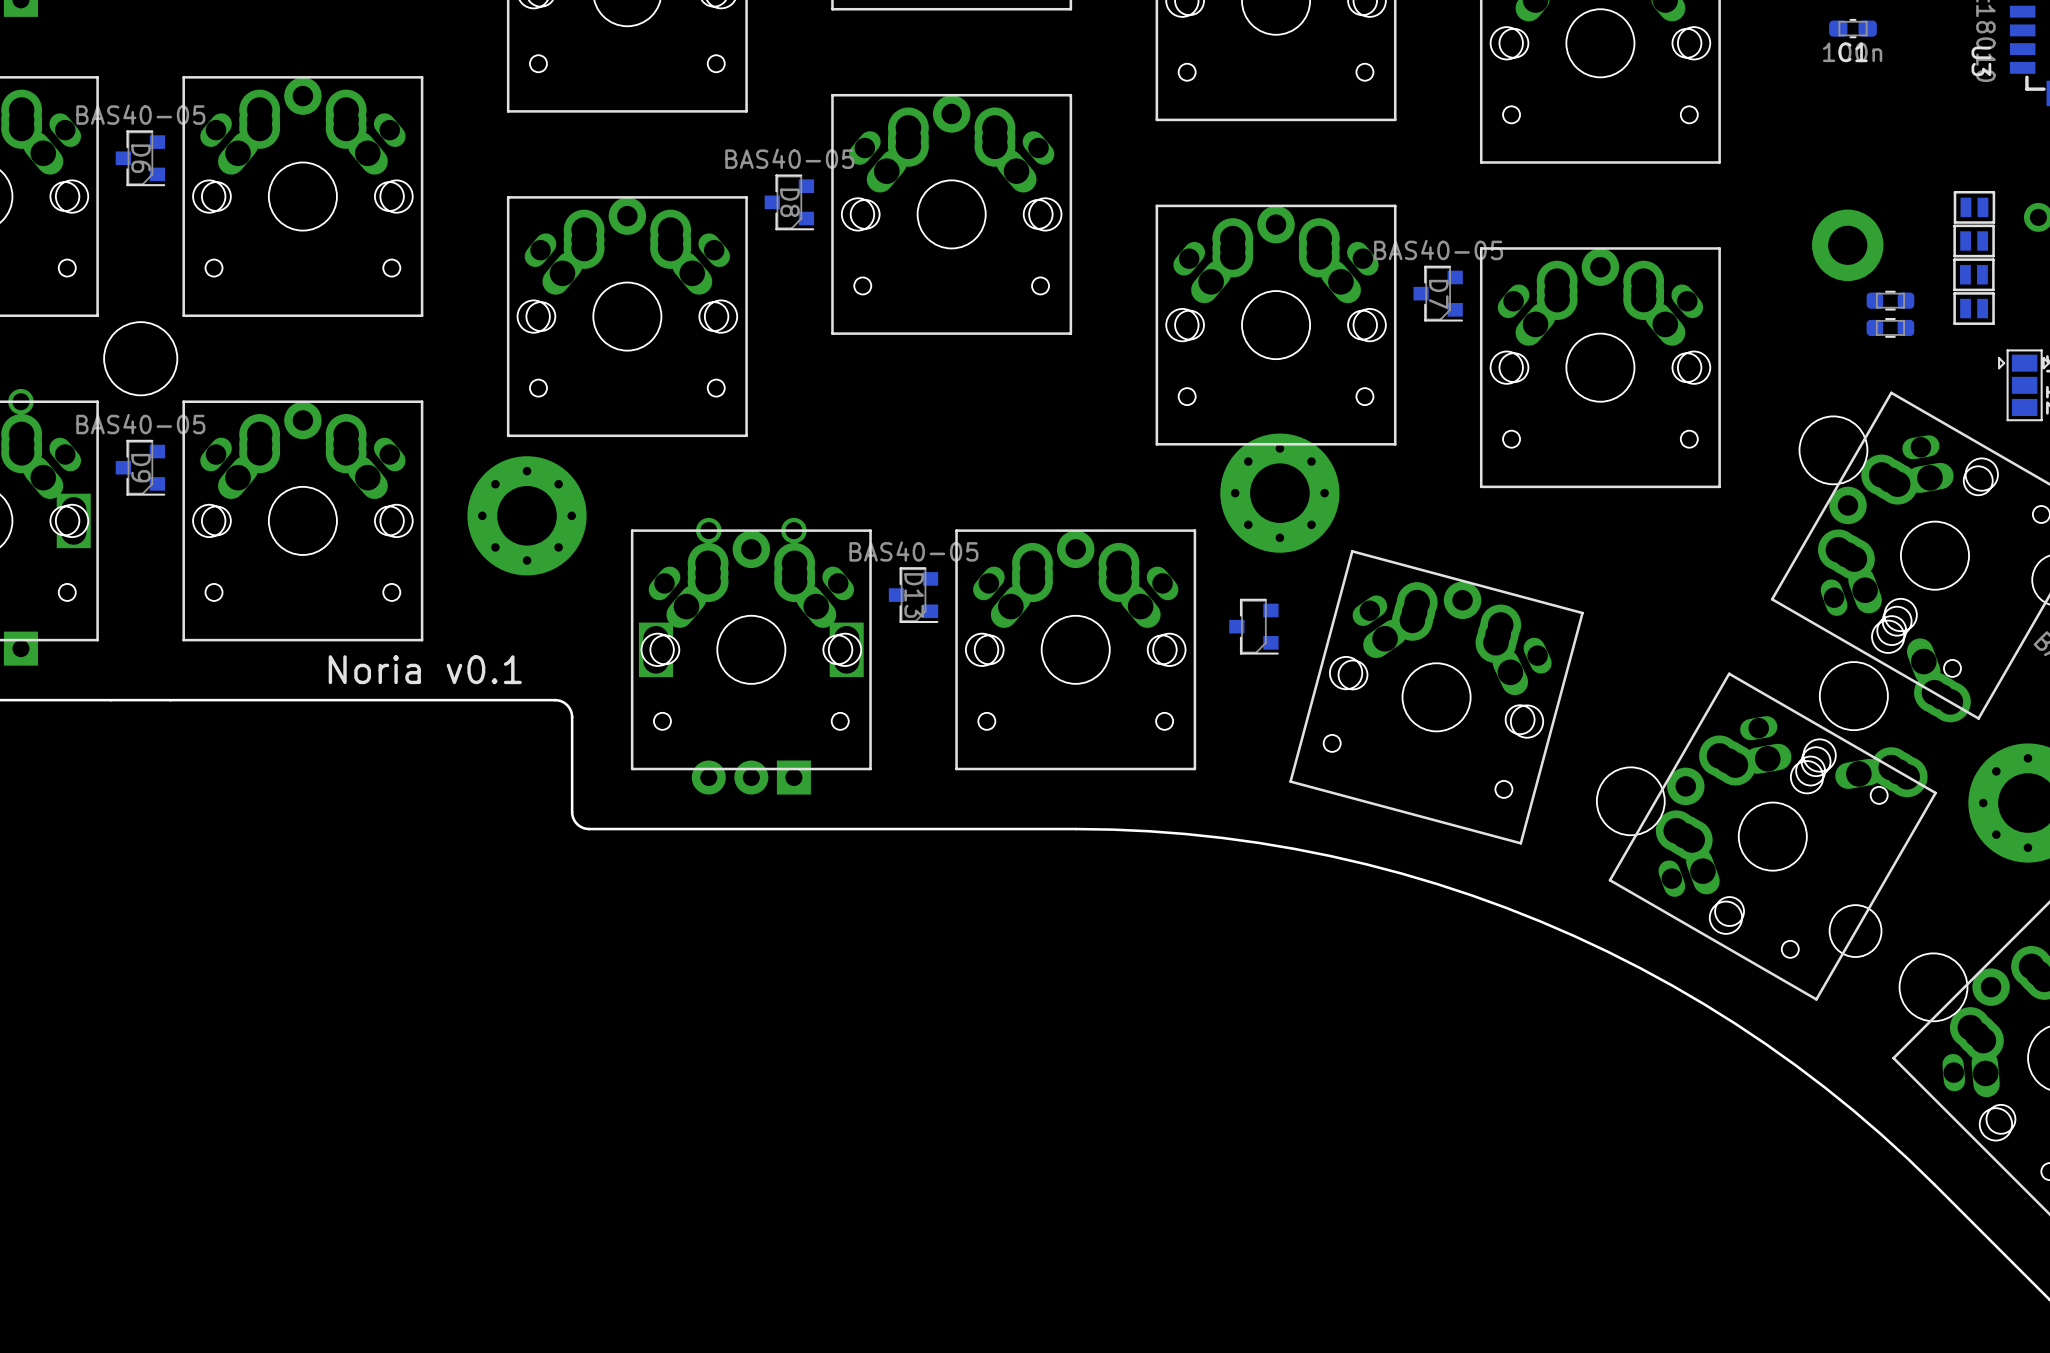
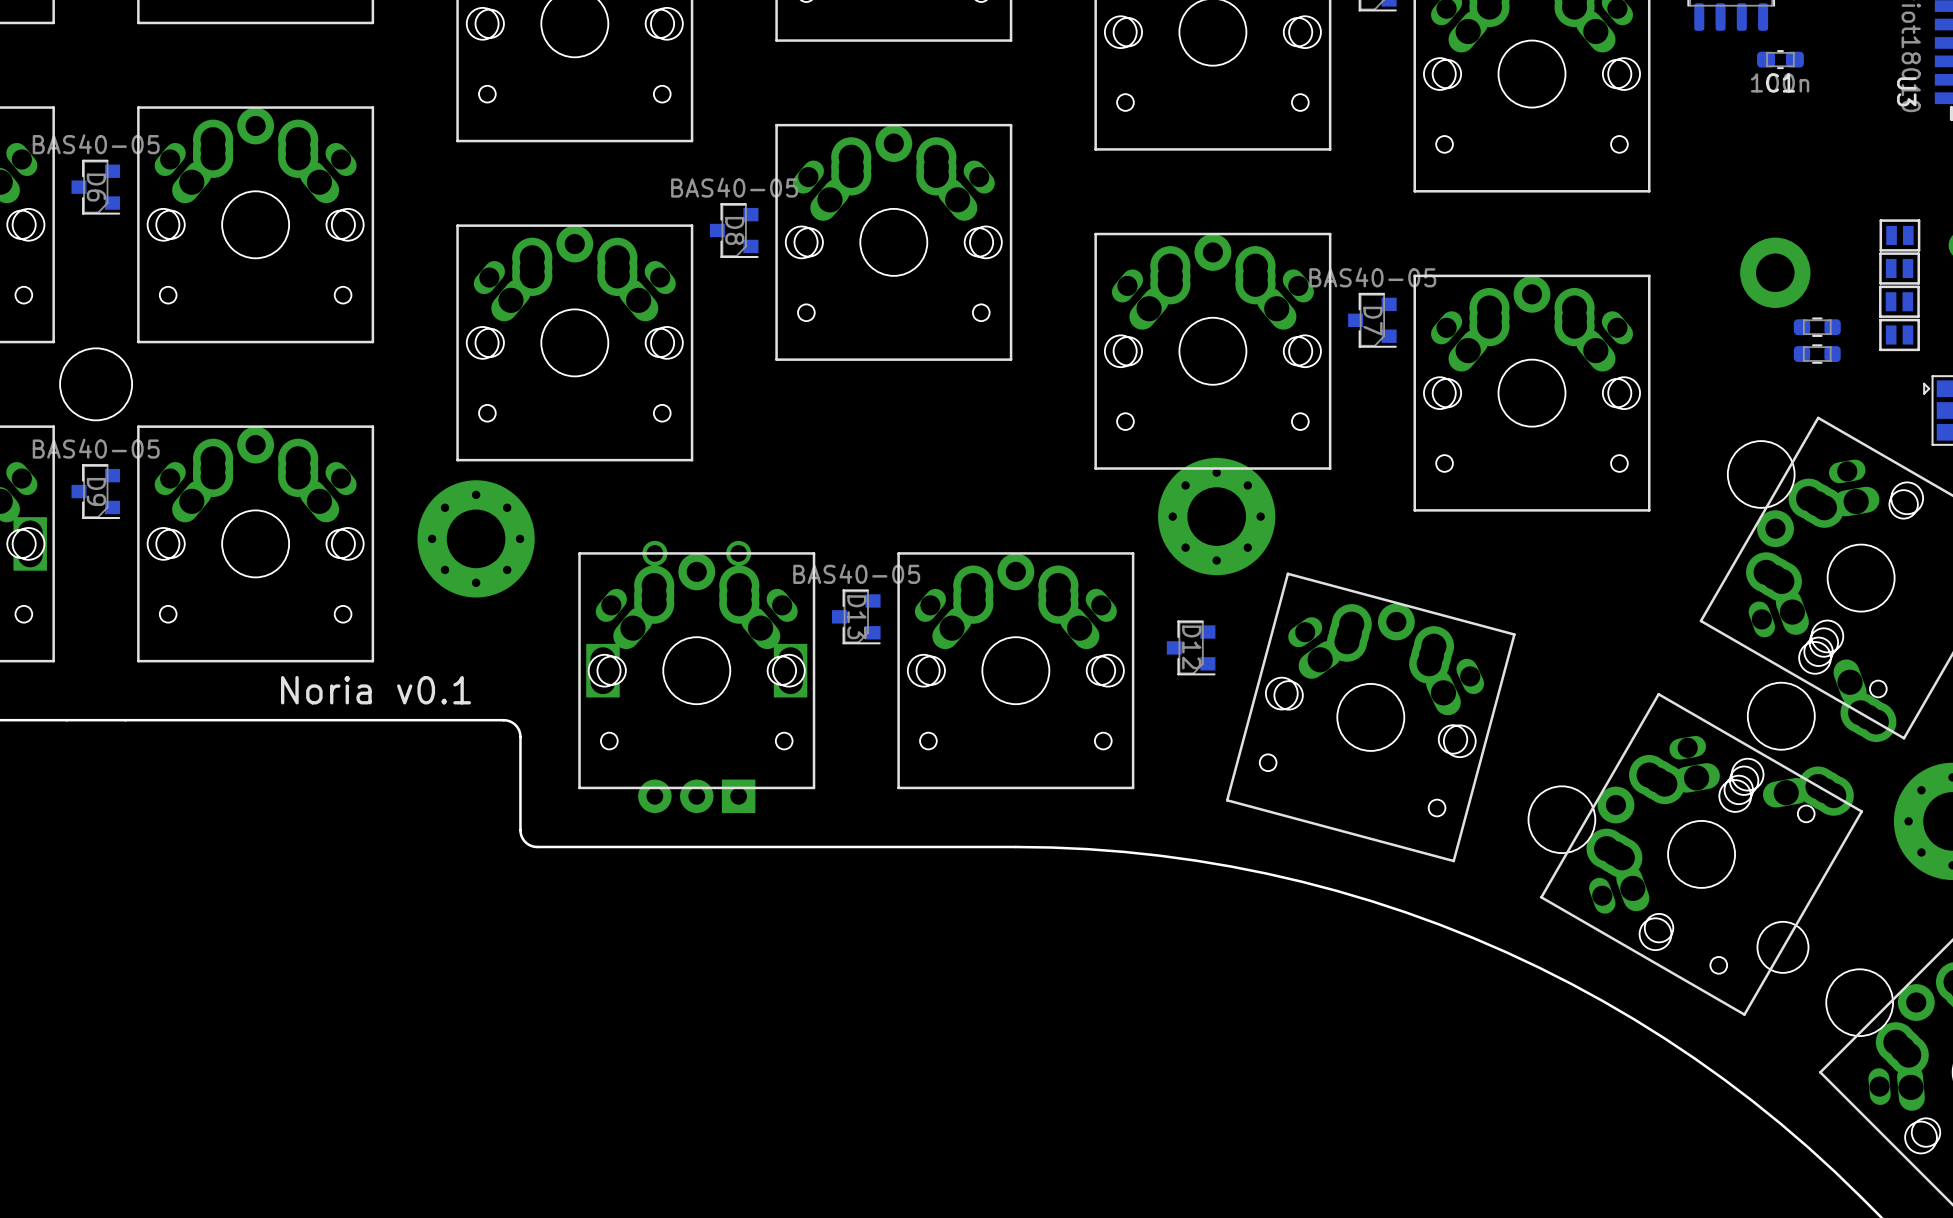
D12 name: none -> D12 (1191, 647)

